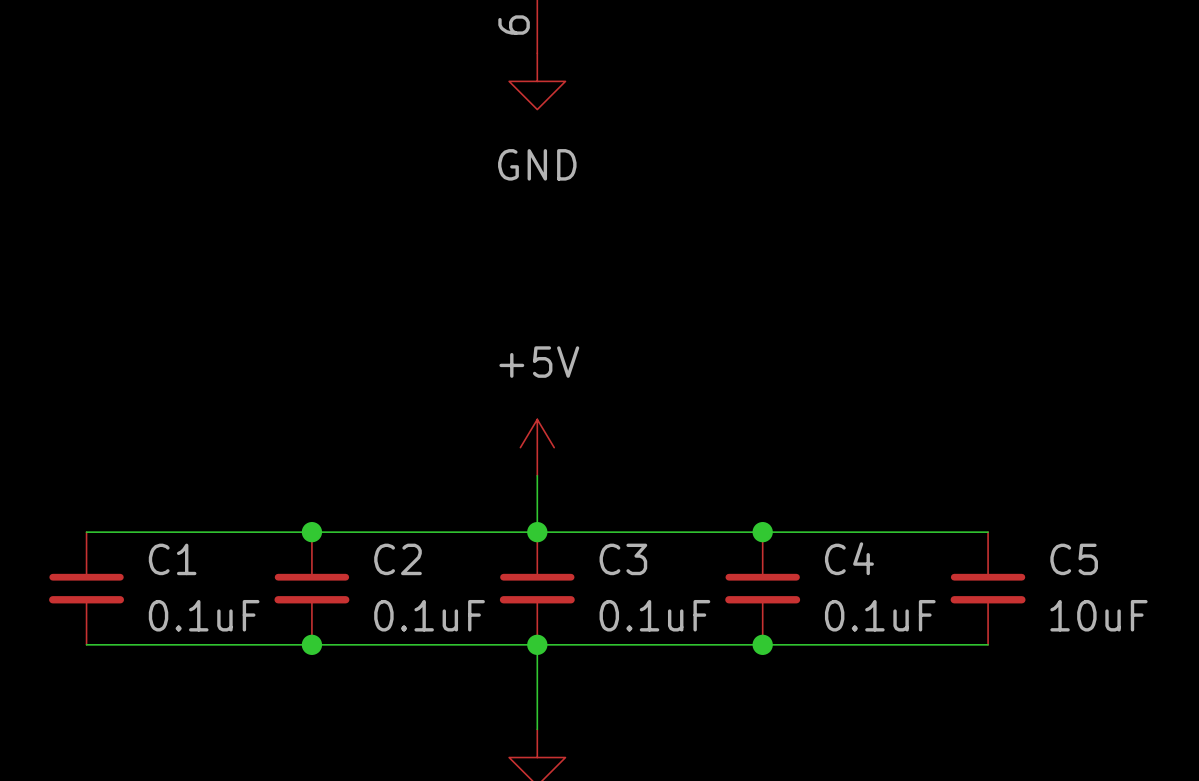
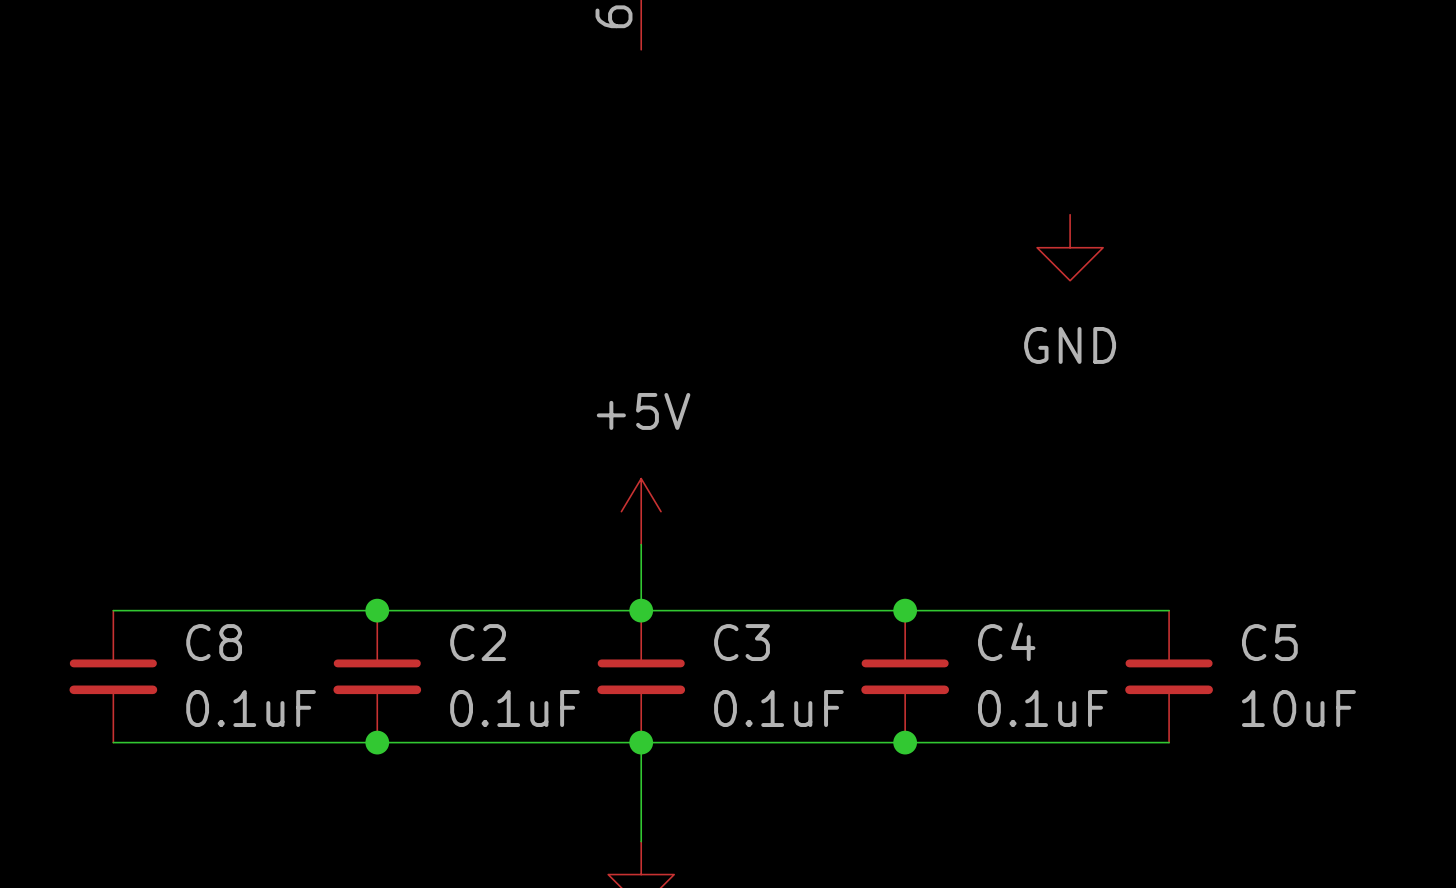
power symbol: GND (537, 81) -> none
power symbol: none -> GND (1070, 247)
C1 name: C1 (172, 559) -> C8 (214, 642)

